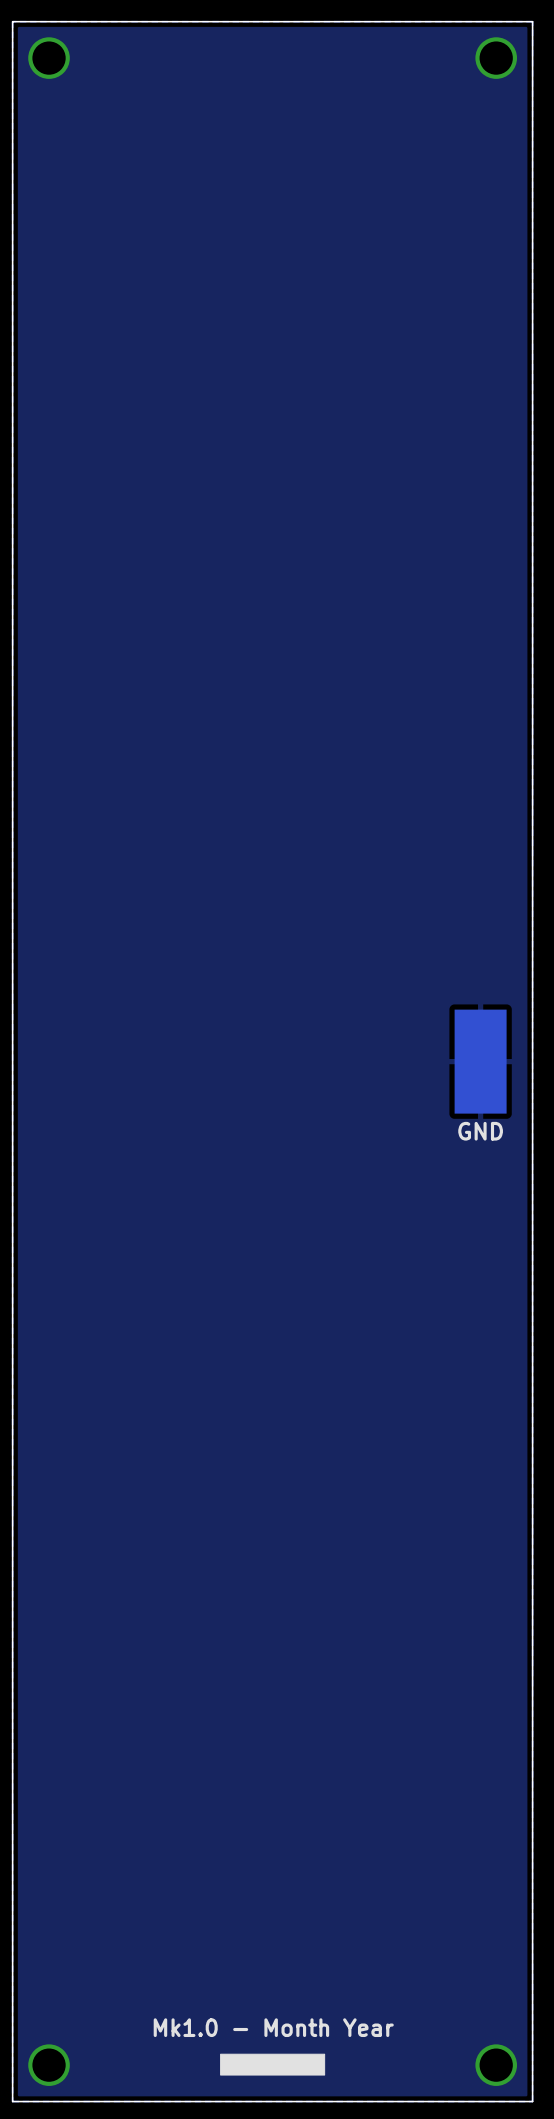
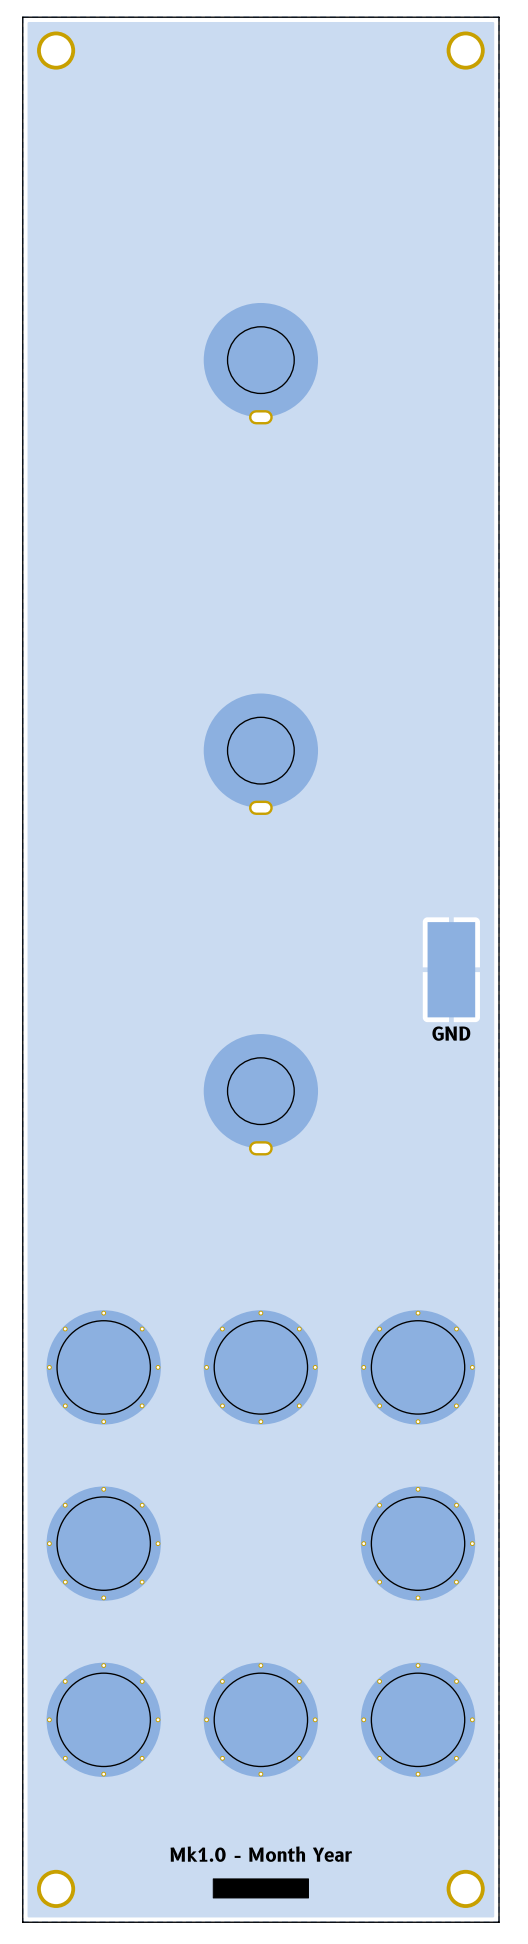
part: none -> (260, 363)
part: none -> (260, 754)
part: none -> (260, 1094)
part: none -> (103, 1367)
part: none -> (260, 1367)
part: none -> (418, 1367)
part: none -> (103, 1543)
part: none -> (418, 1543)
part: none -> (103, 1719)
part: none -> (260, 1719)
part: none -> (418, 1719)

